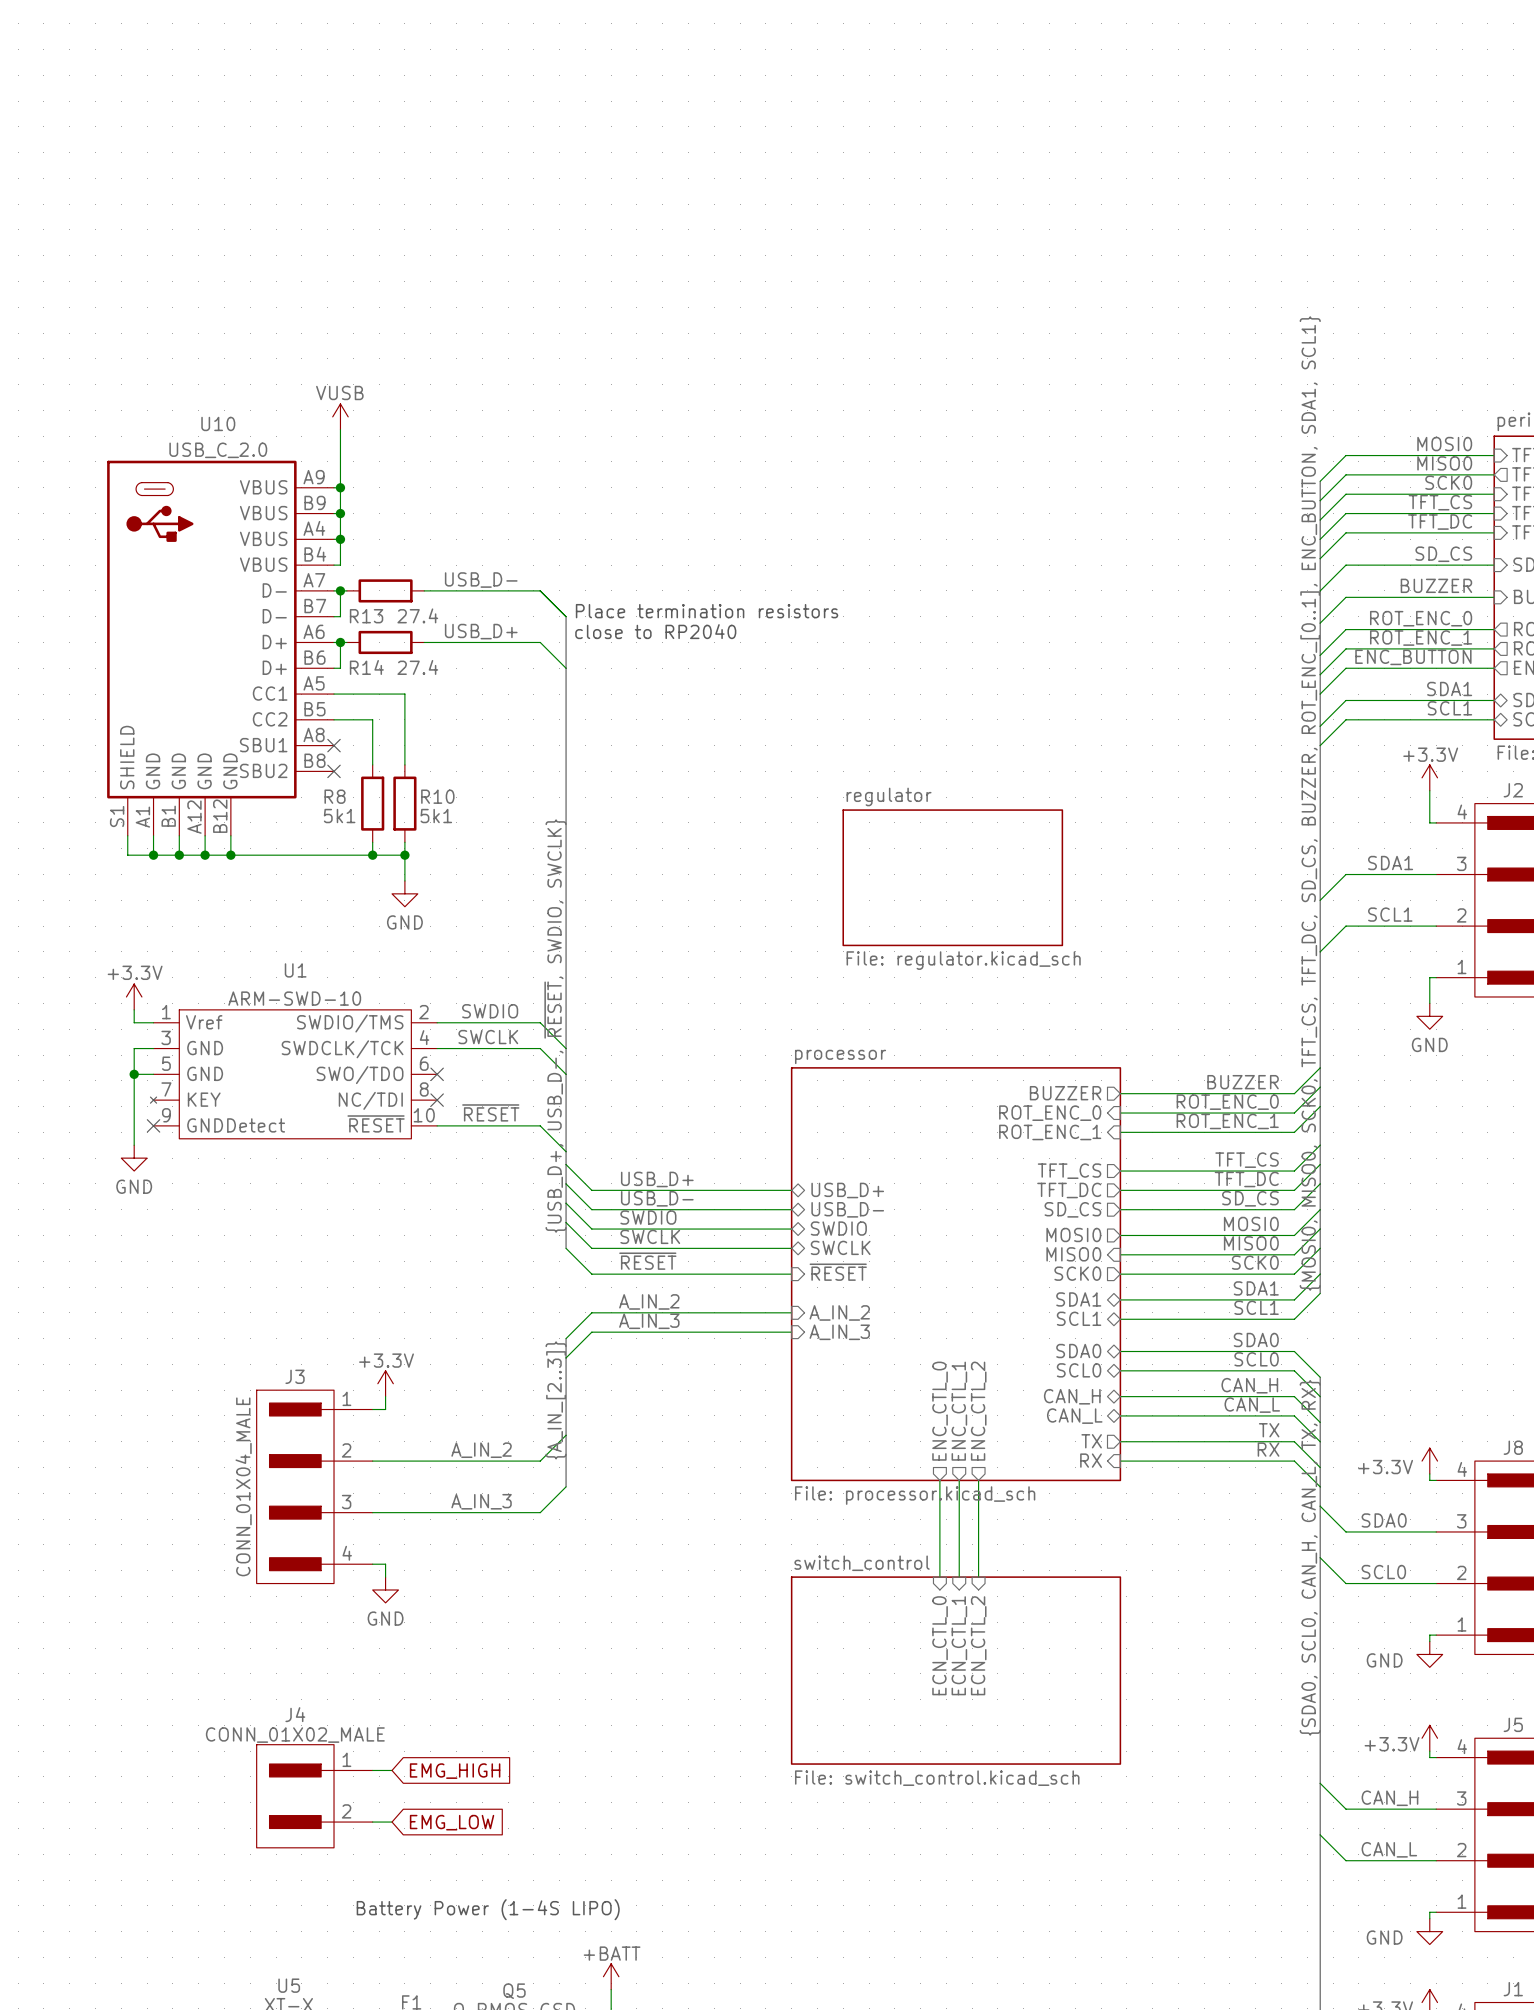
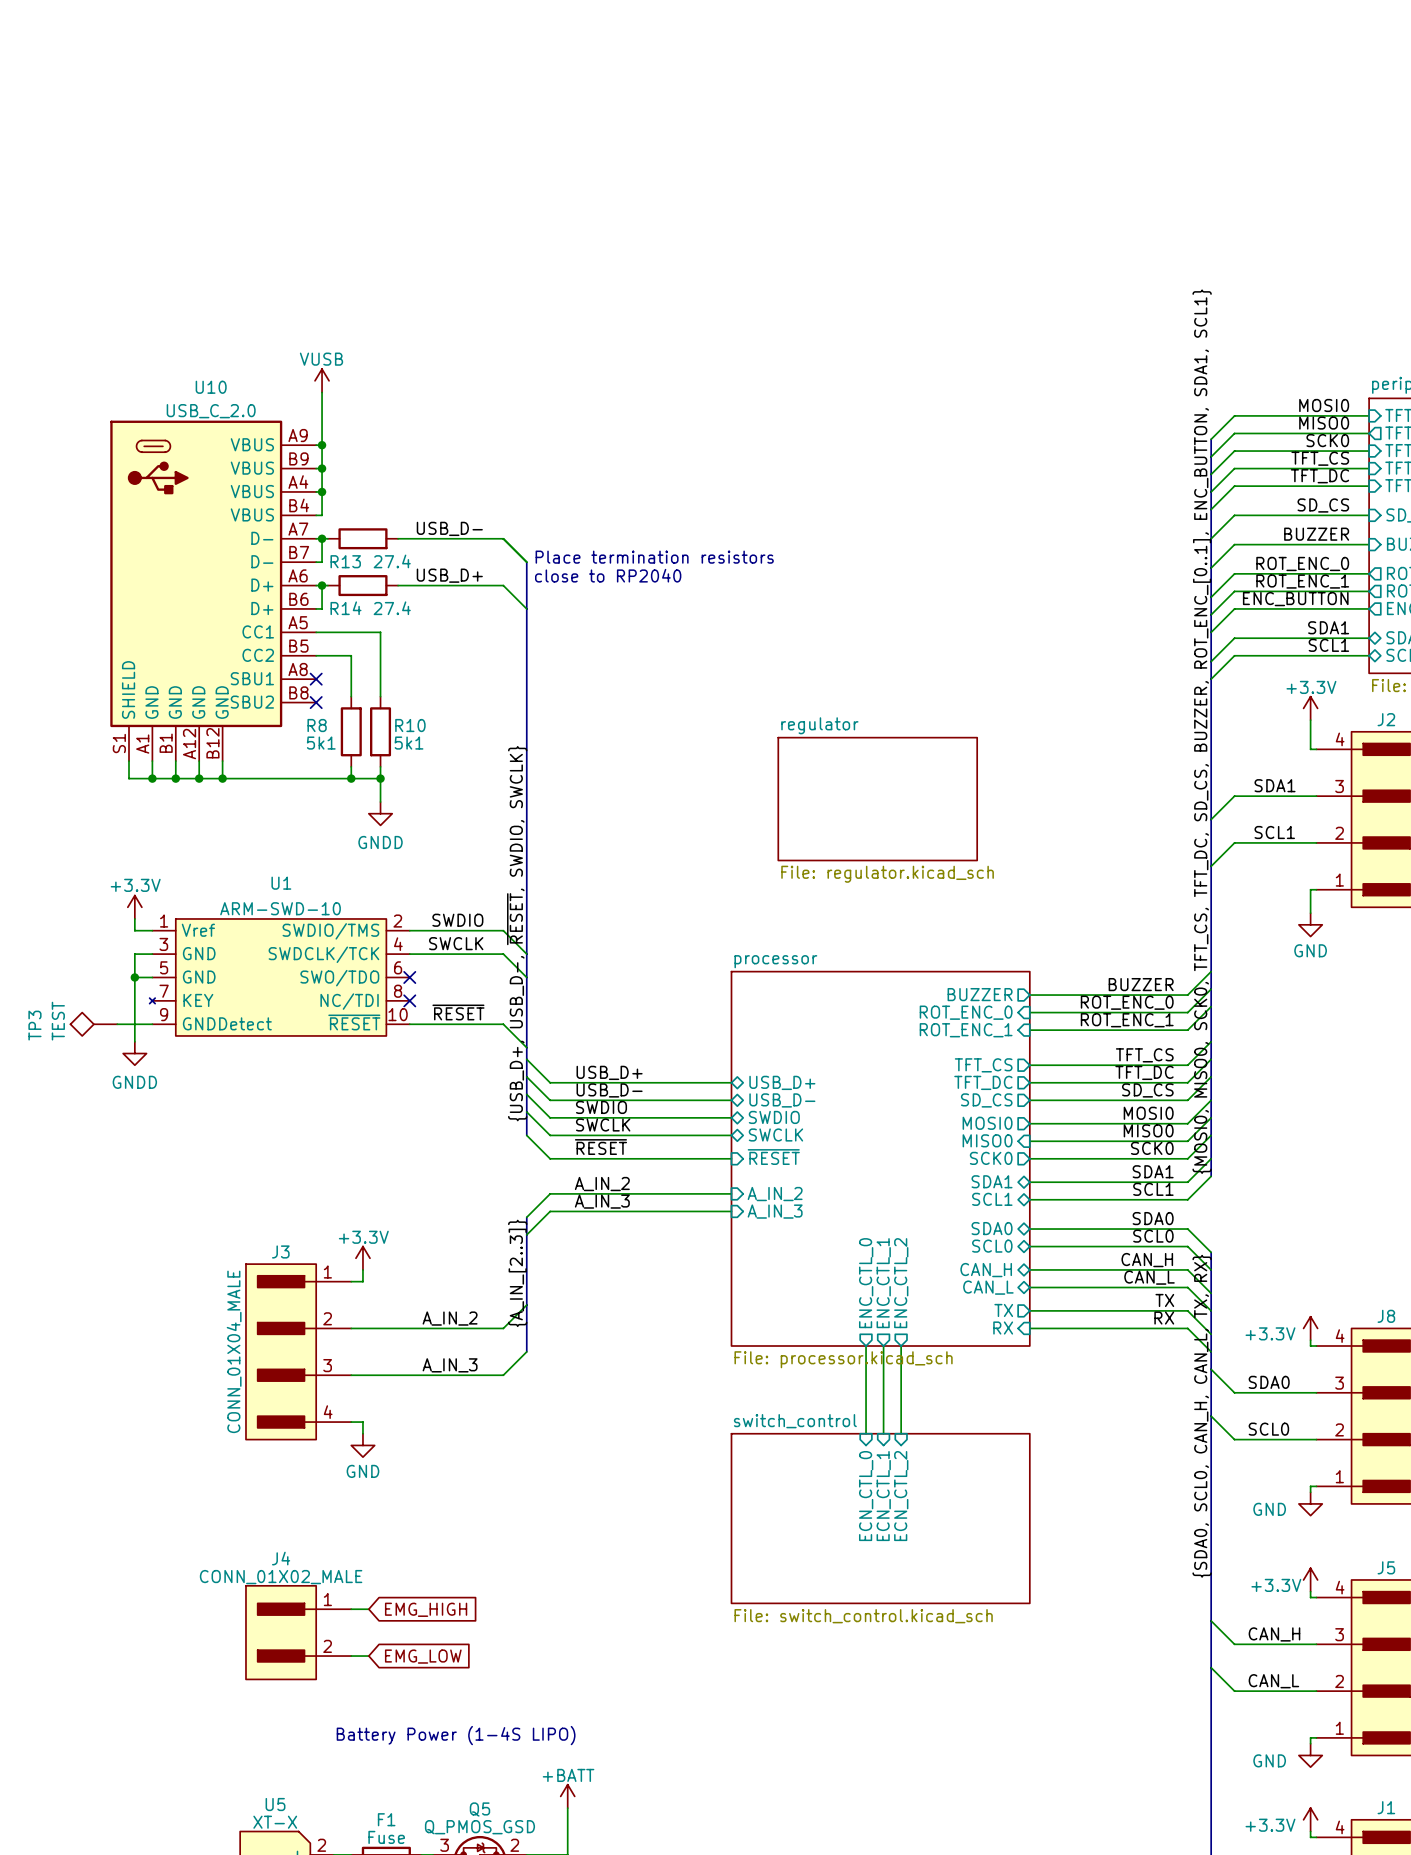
power symbol: GND (404, 893) -> GNDD (380, 813)
TP3: none -> TEST (93, 1024)
wire: none -> (117, 1024) (152, 1024)
no-connect mark: (153, 1125) -> none
power symbol: GND (134, 1158) -> GNDD (134, 1053)

